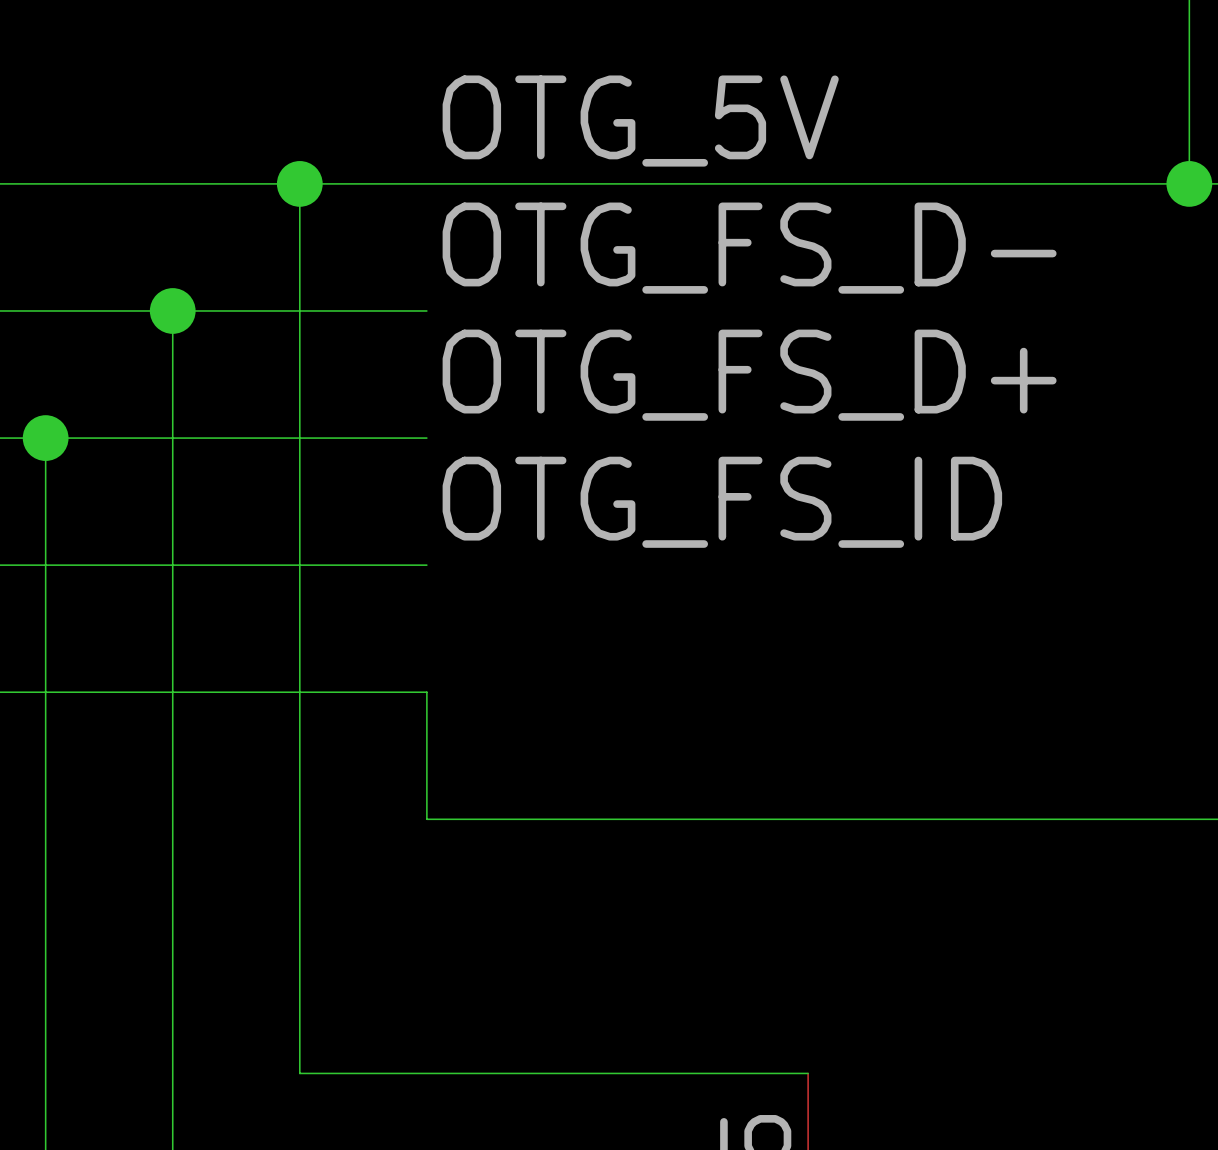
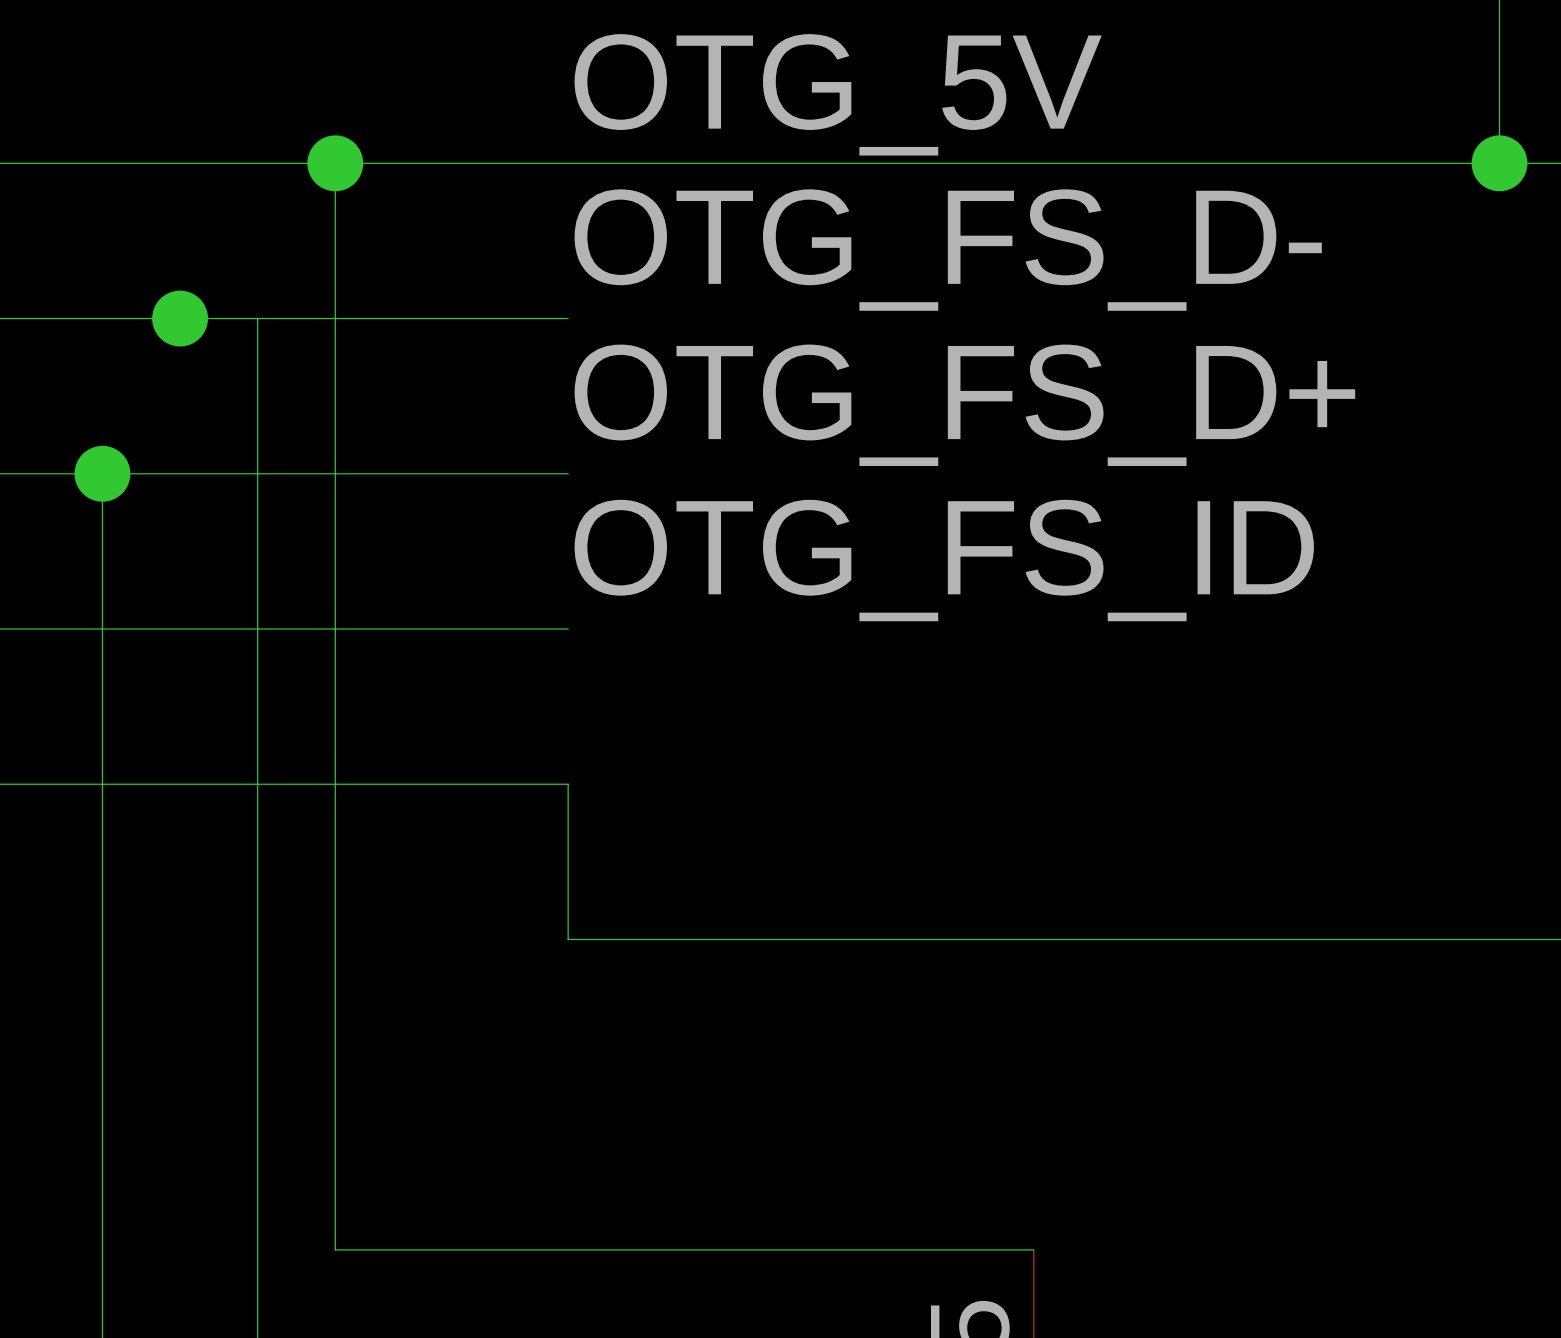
wire: (299, 183) (299, 1073) -> (335, 163) (335, 1249) (412, 1249)
junction position: (299, 183) -> (335, 163)
junction position: (172, 310) -> (180, 318)

